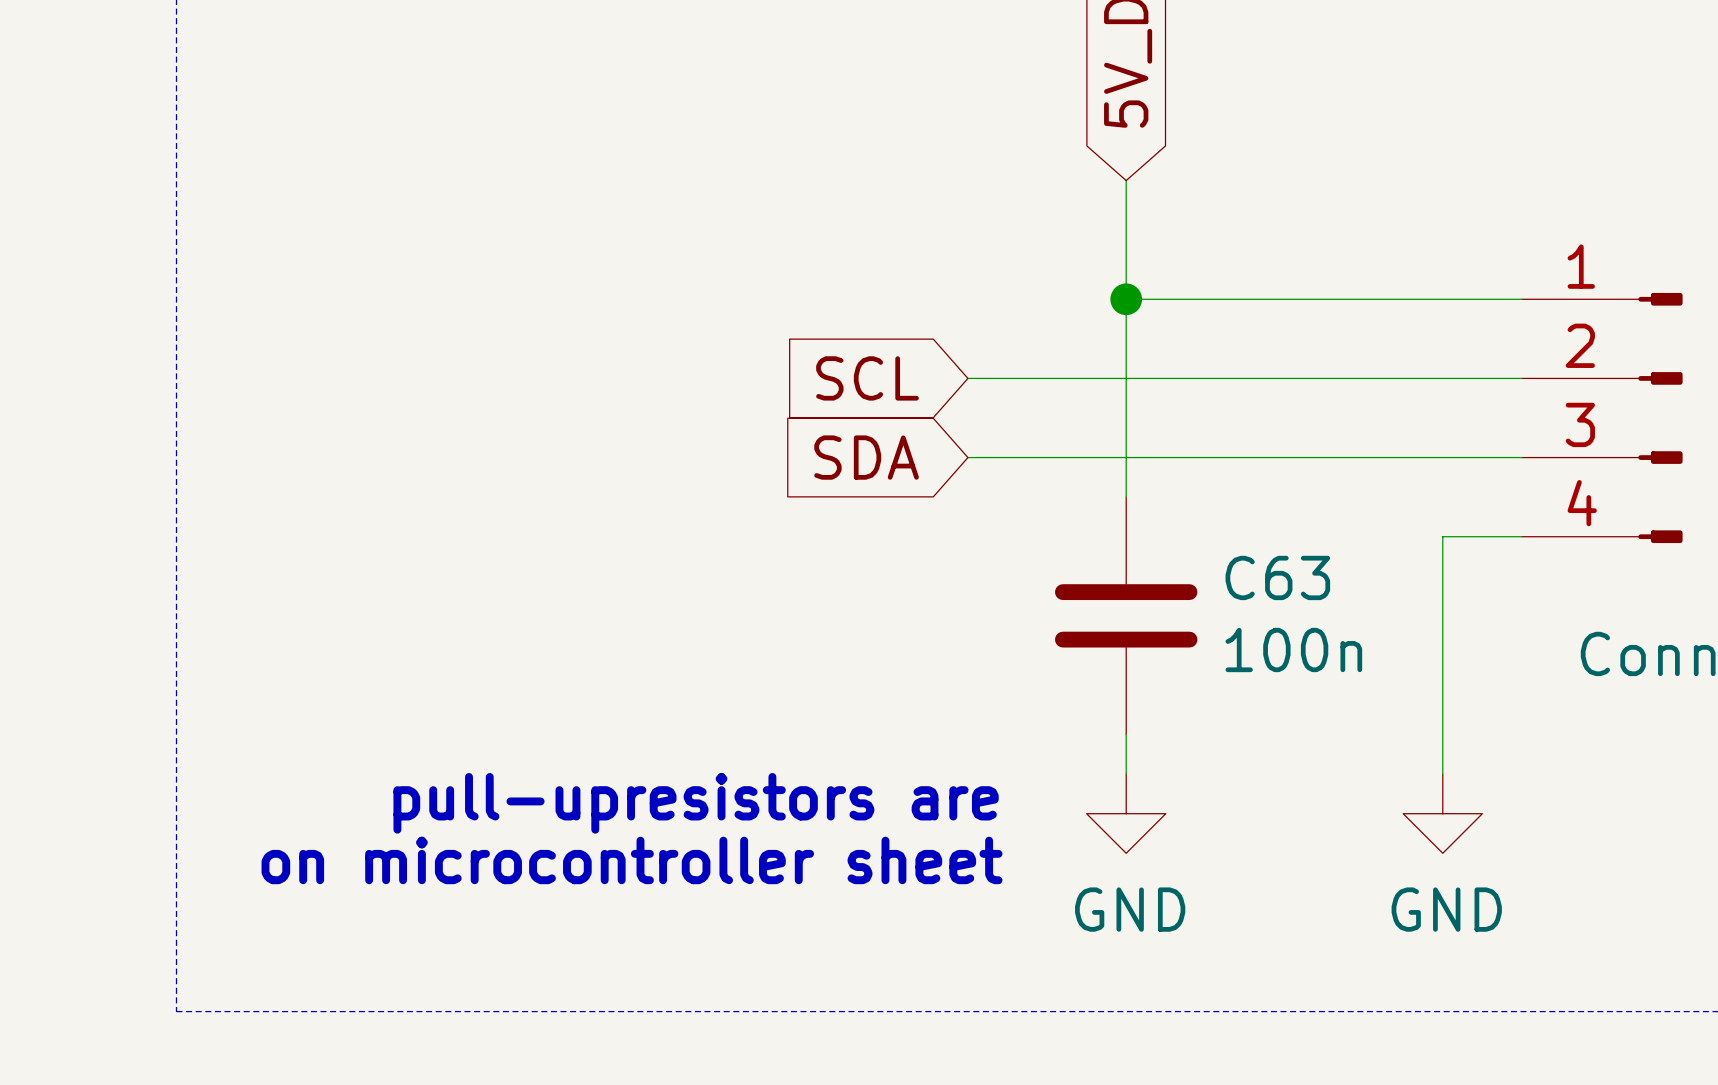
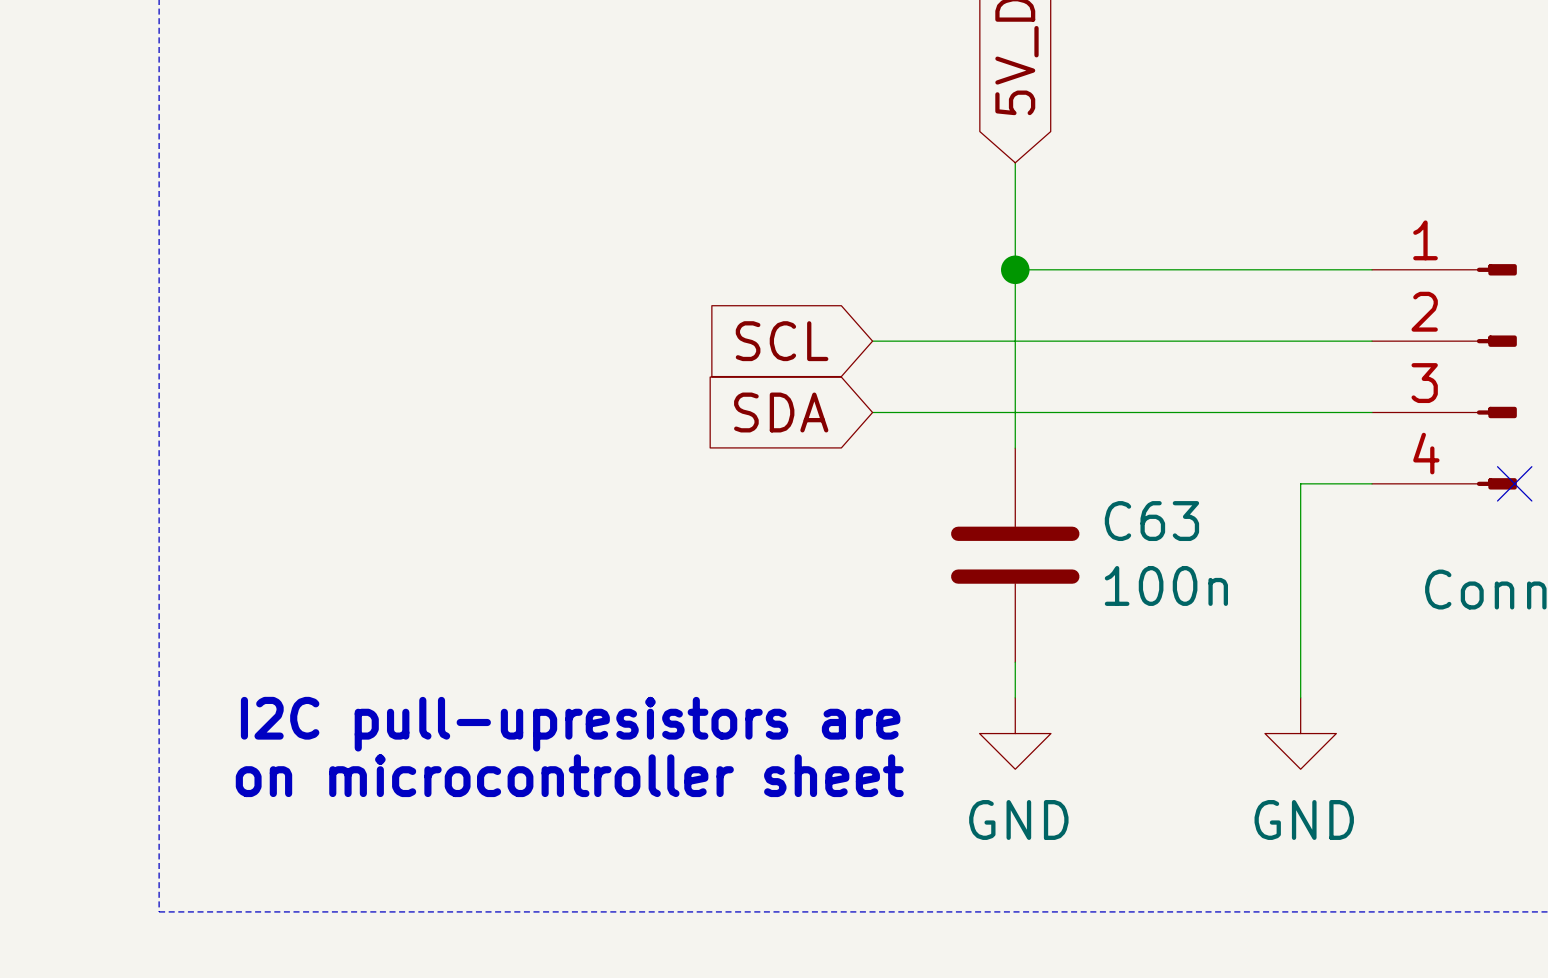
no-connect mark: none -> (1514, 483)
text: pull-upresistors are (696, 803) -> I2C pull-upresistors are (570, 724)

